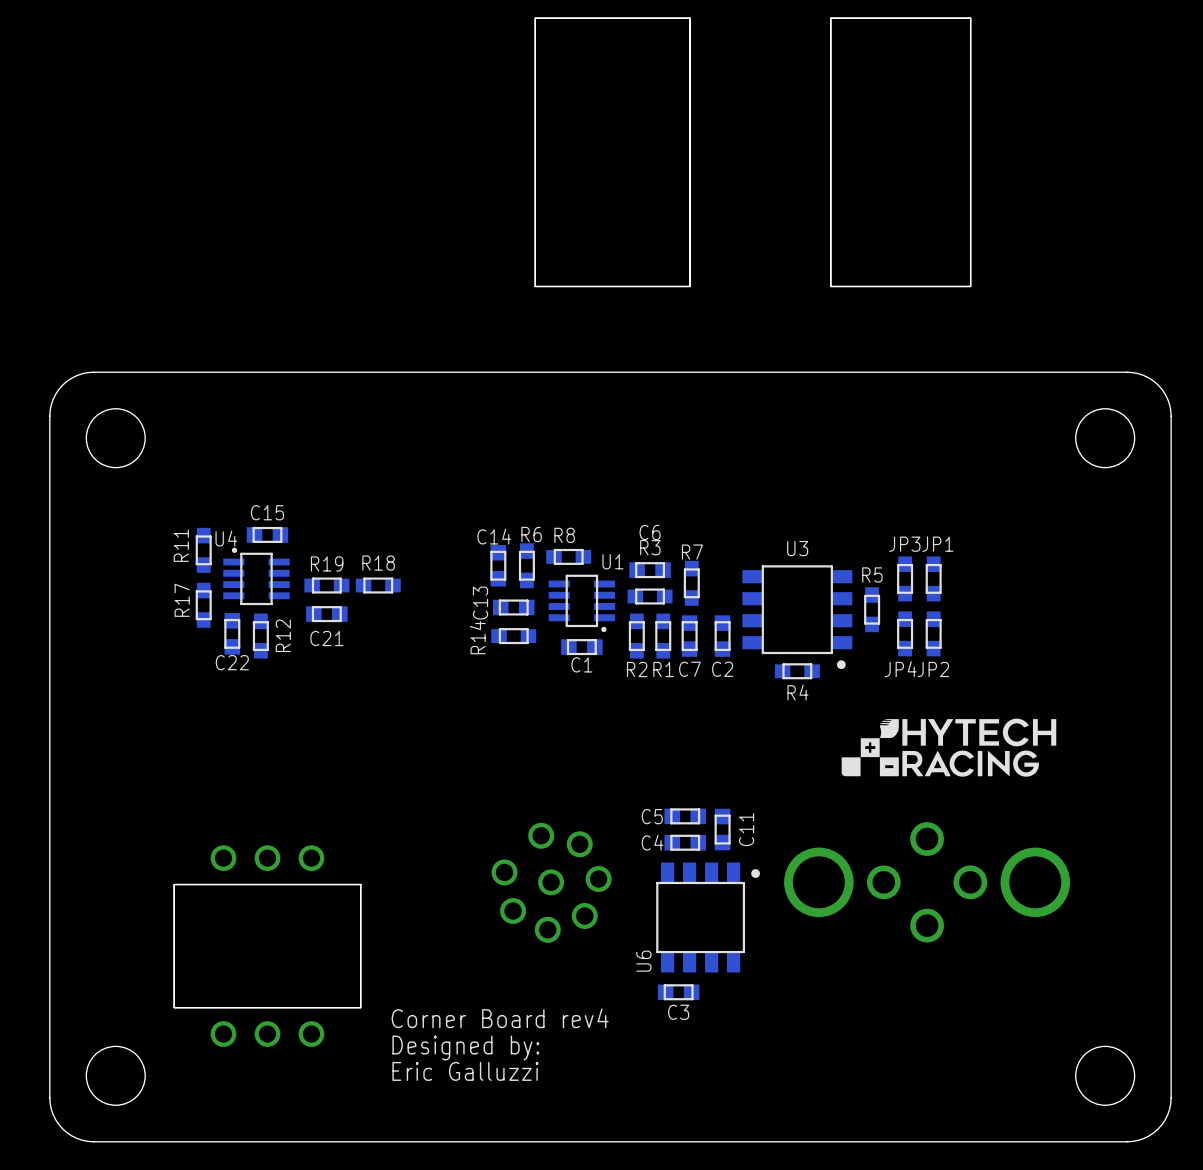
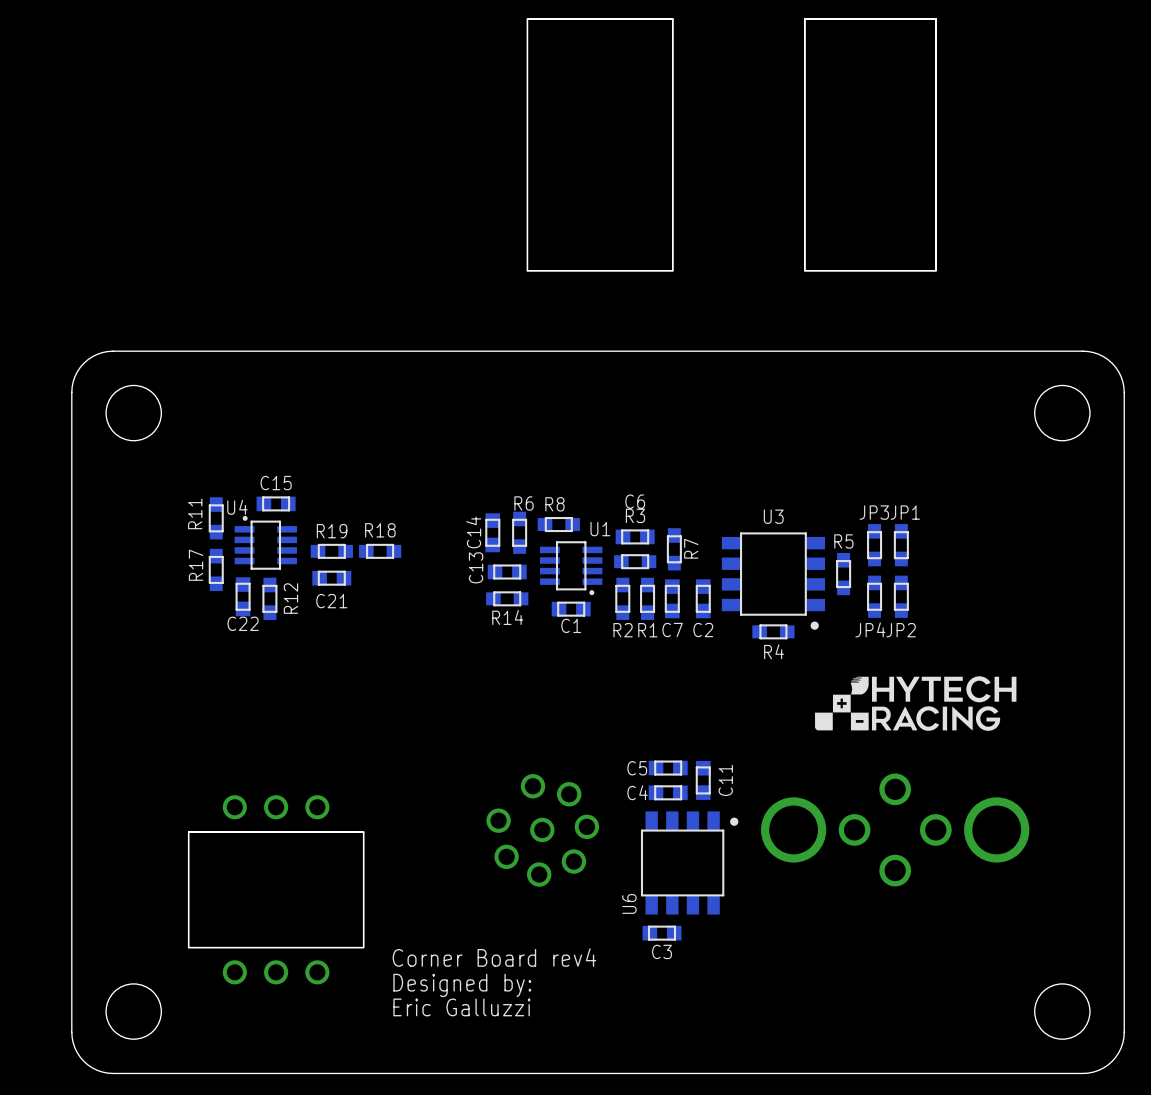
C14 name rotation: 0° (494, 536) -> 90° counterclockwise (473, 532)
R7 name rotation: 0° (692, 552) -> 90° counterclockwise (691, 548)
R7 name position: R7 (692, 552) -> R7 (691, 548)
R14 name rotation: 0° (477, 637) -> 90° clockwise (507, 617)

